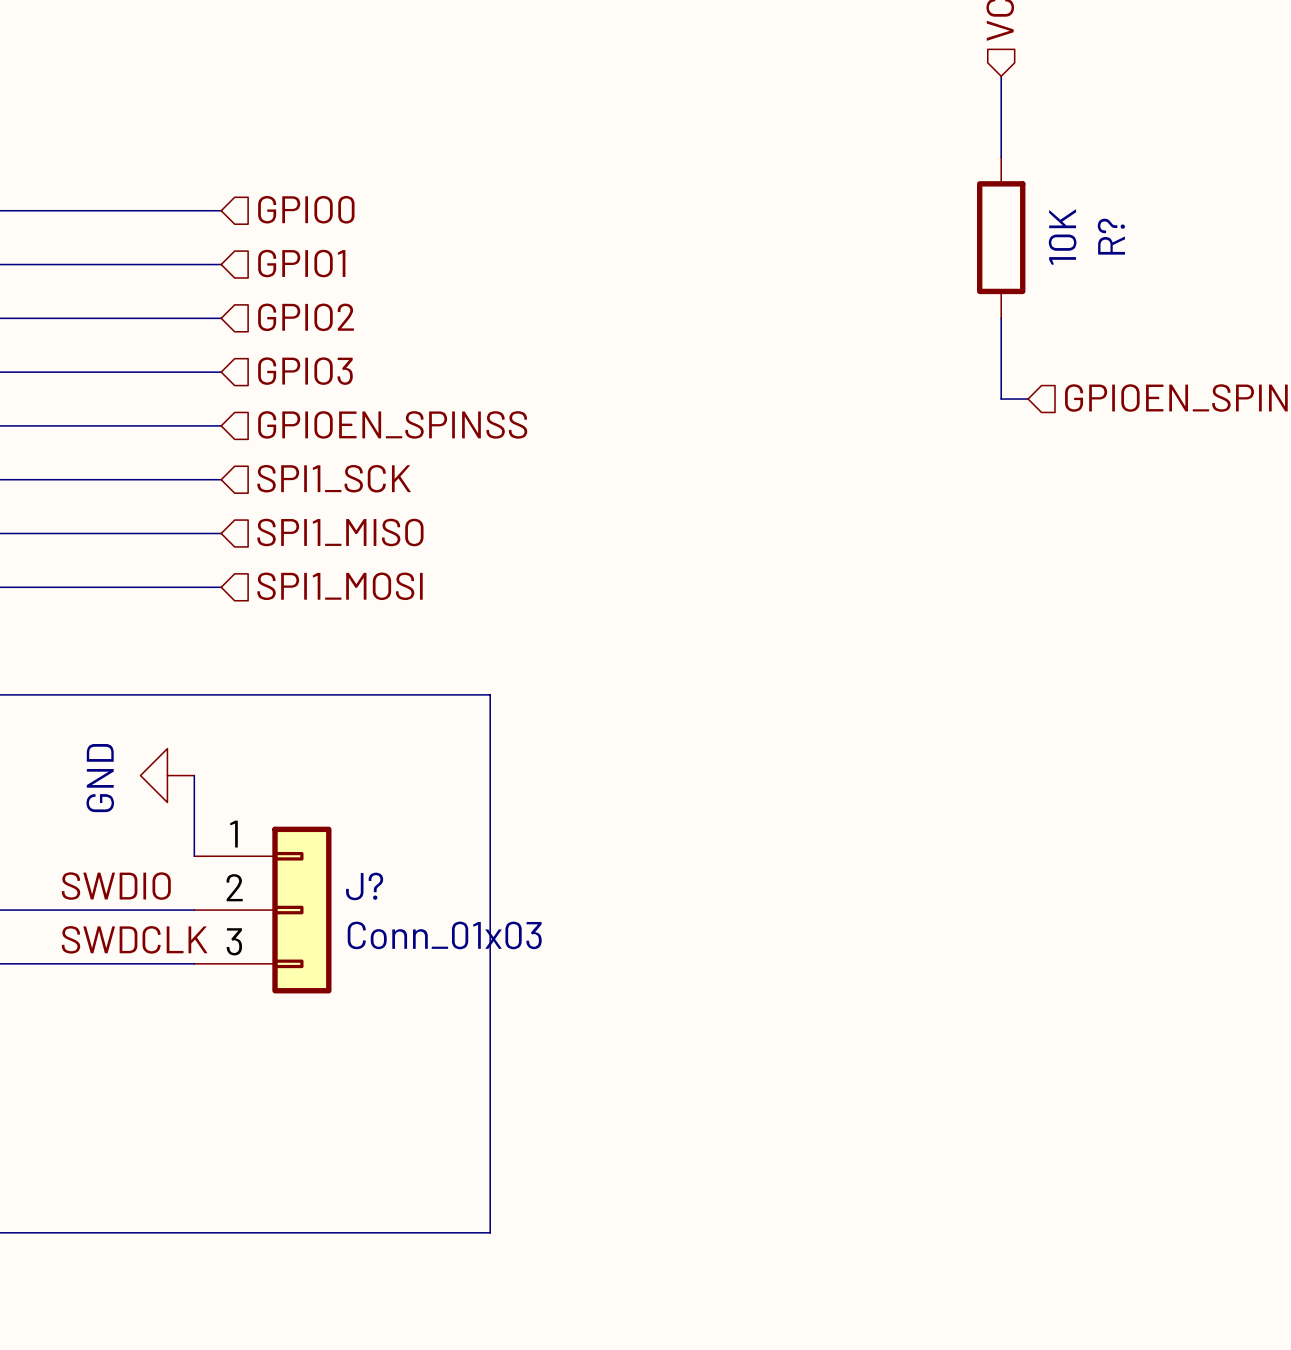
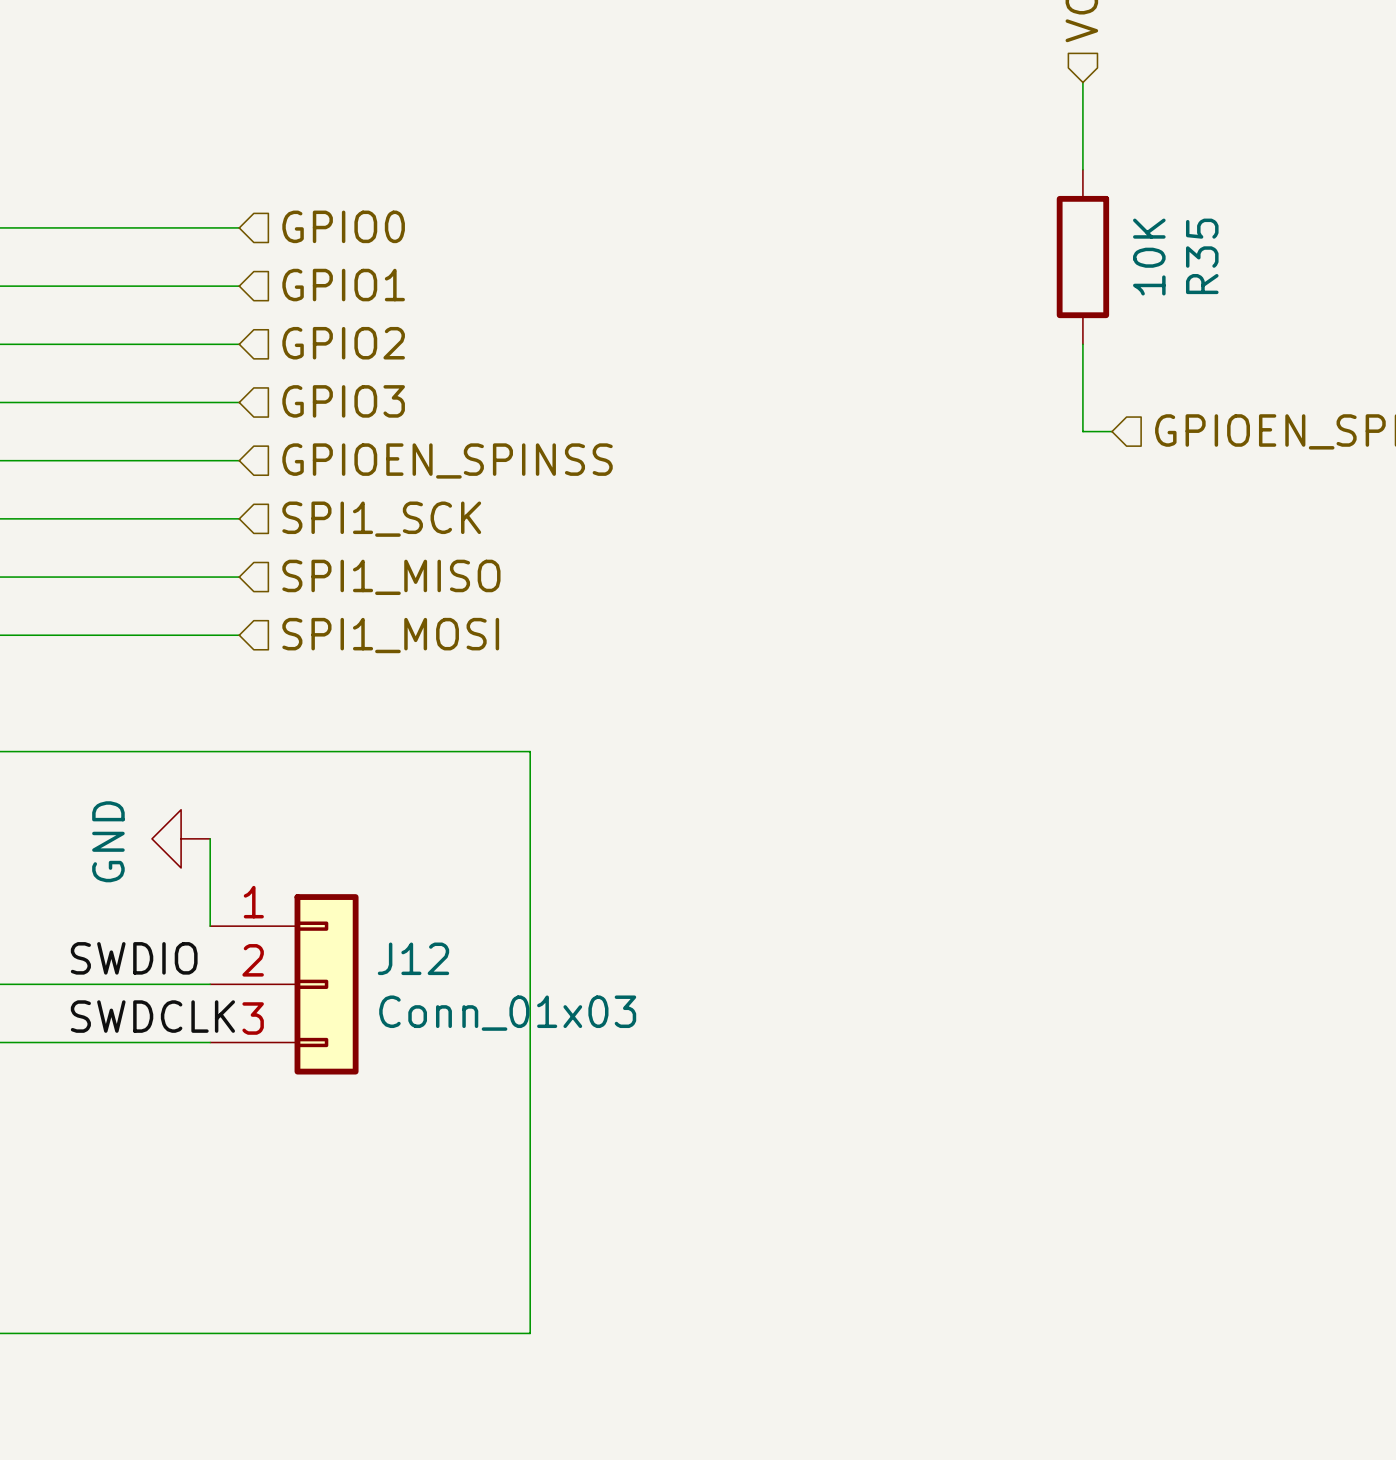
R? name: R? (1111, 236) -> R35 (1202, 256)
J? name: J? (364, 886) -> J12 (413, 958)

